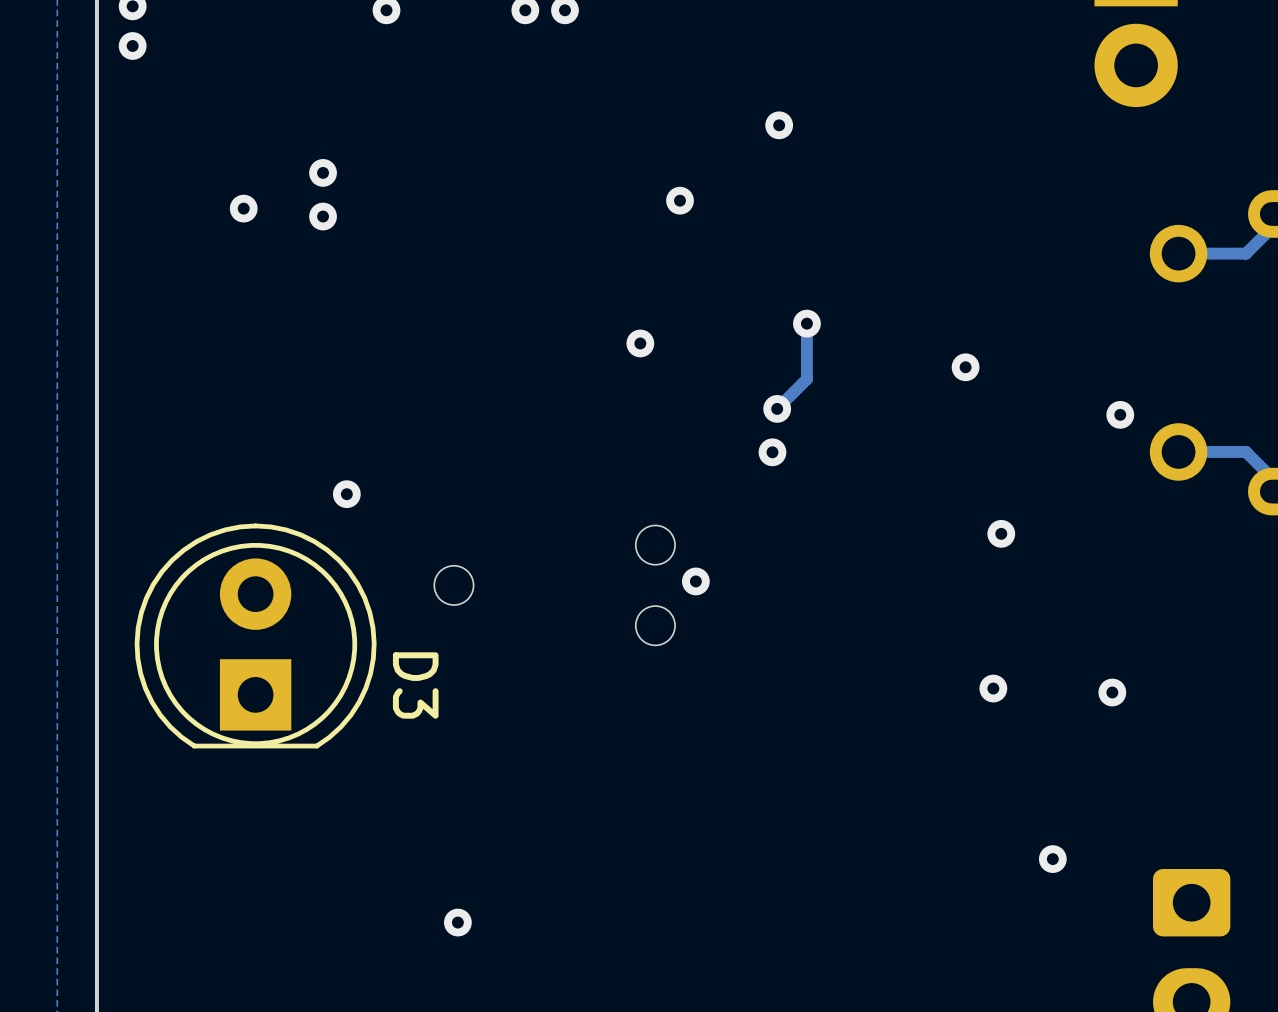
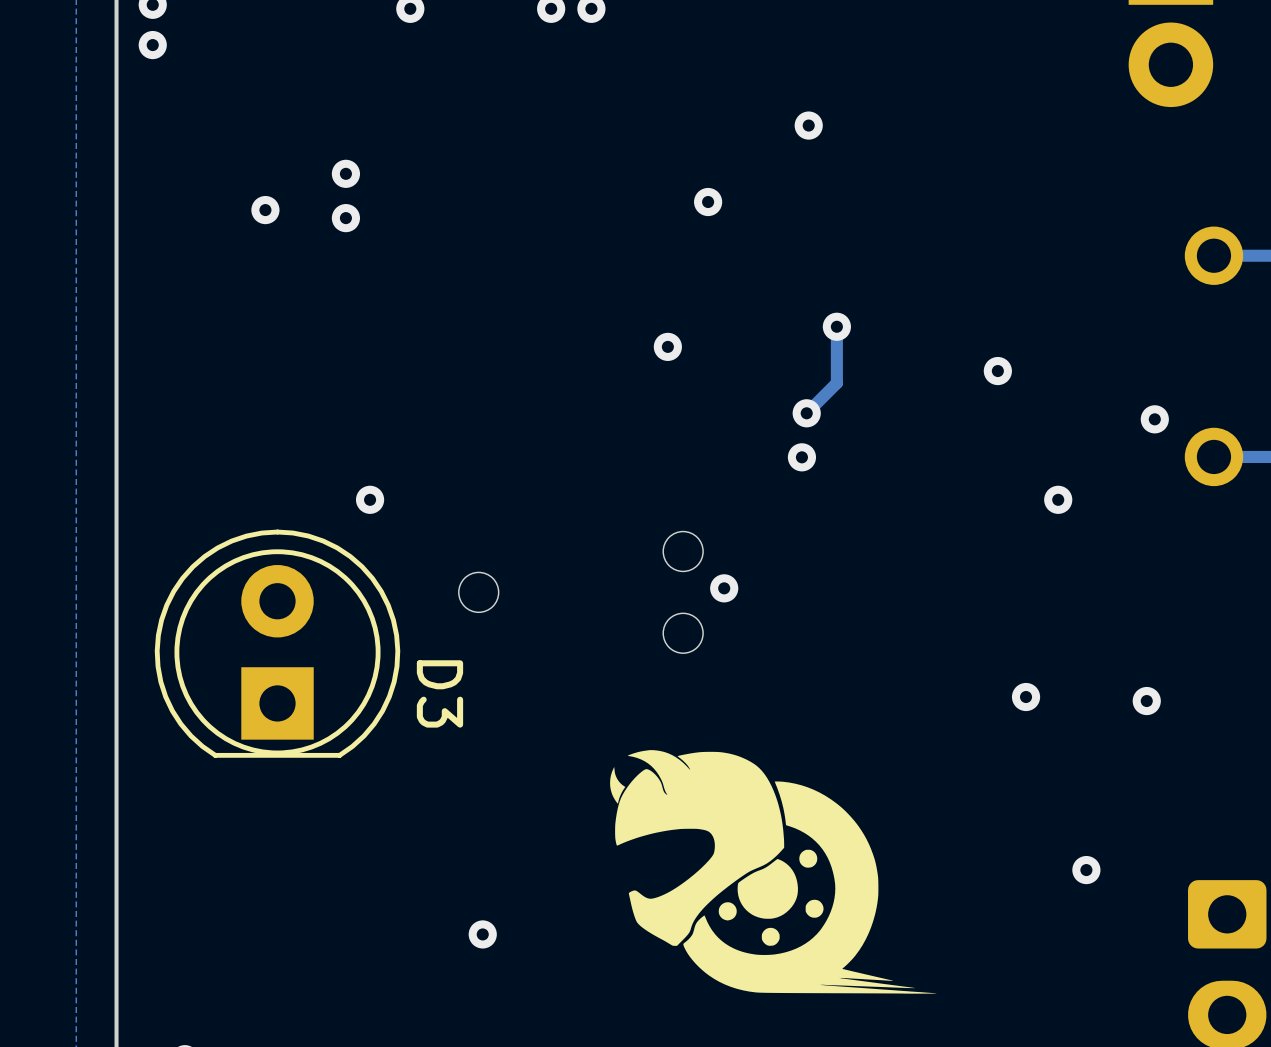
via position: (1001, 533) -> (1058, 499)
drawing: none -> [610, 750, 937, 994]

